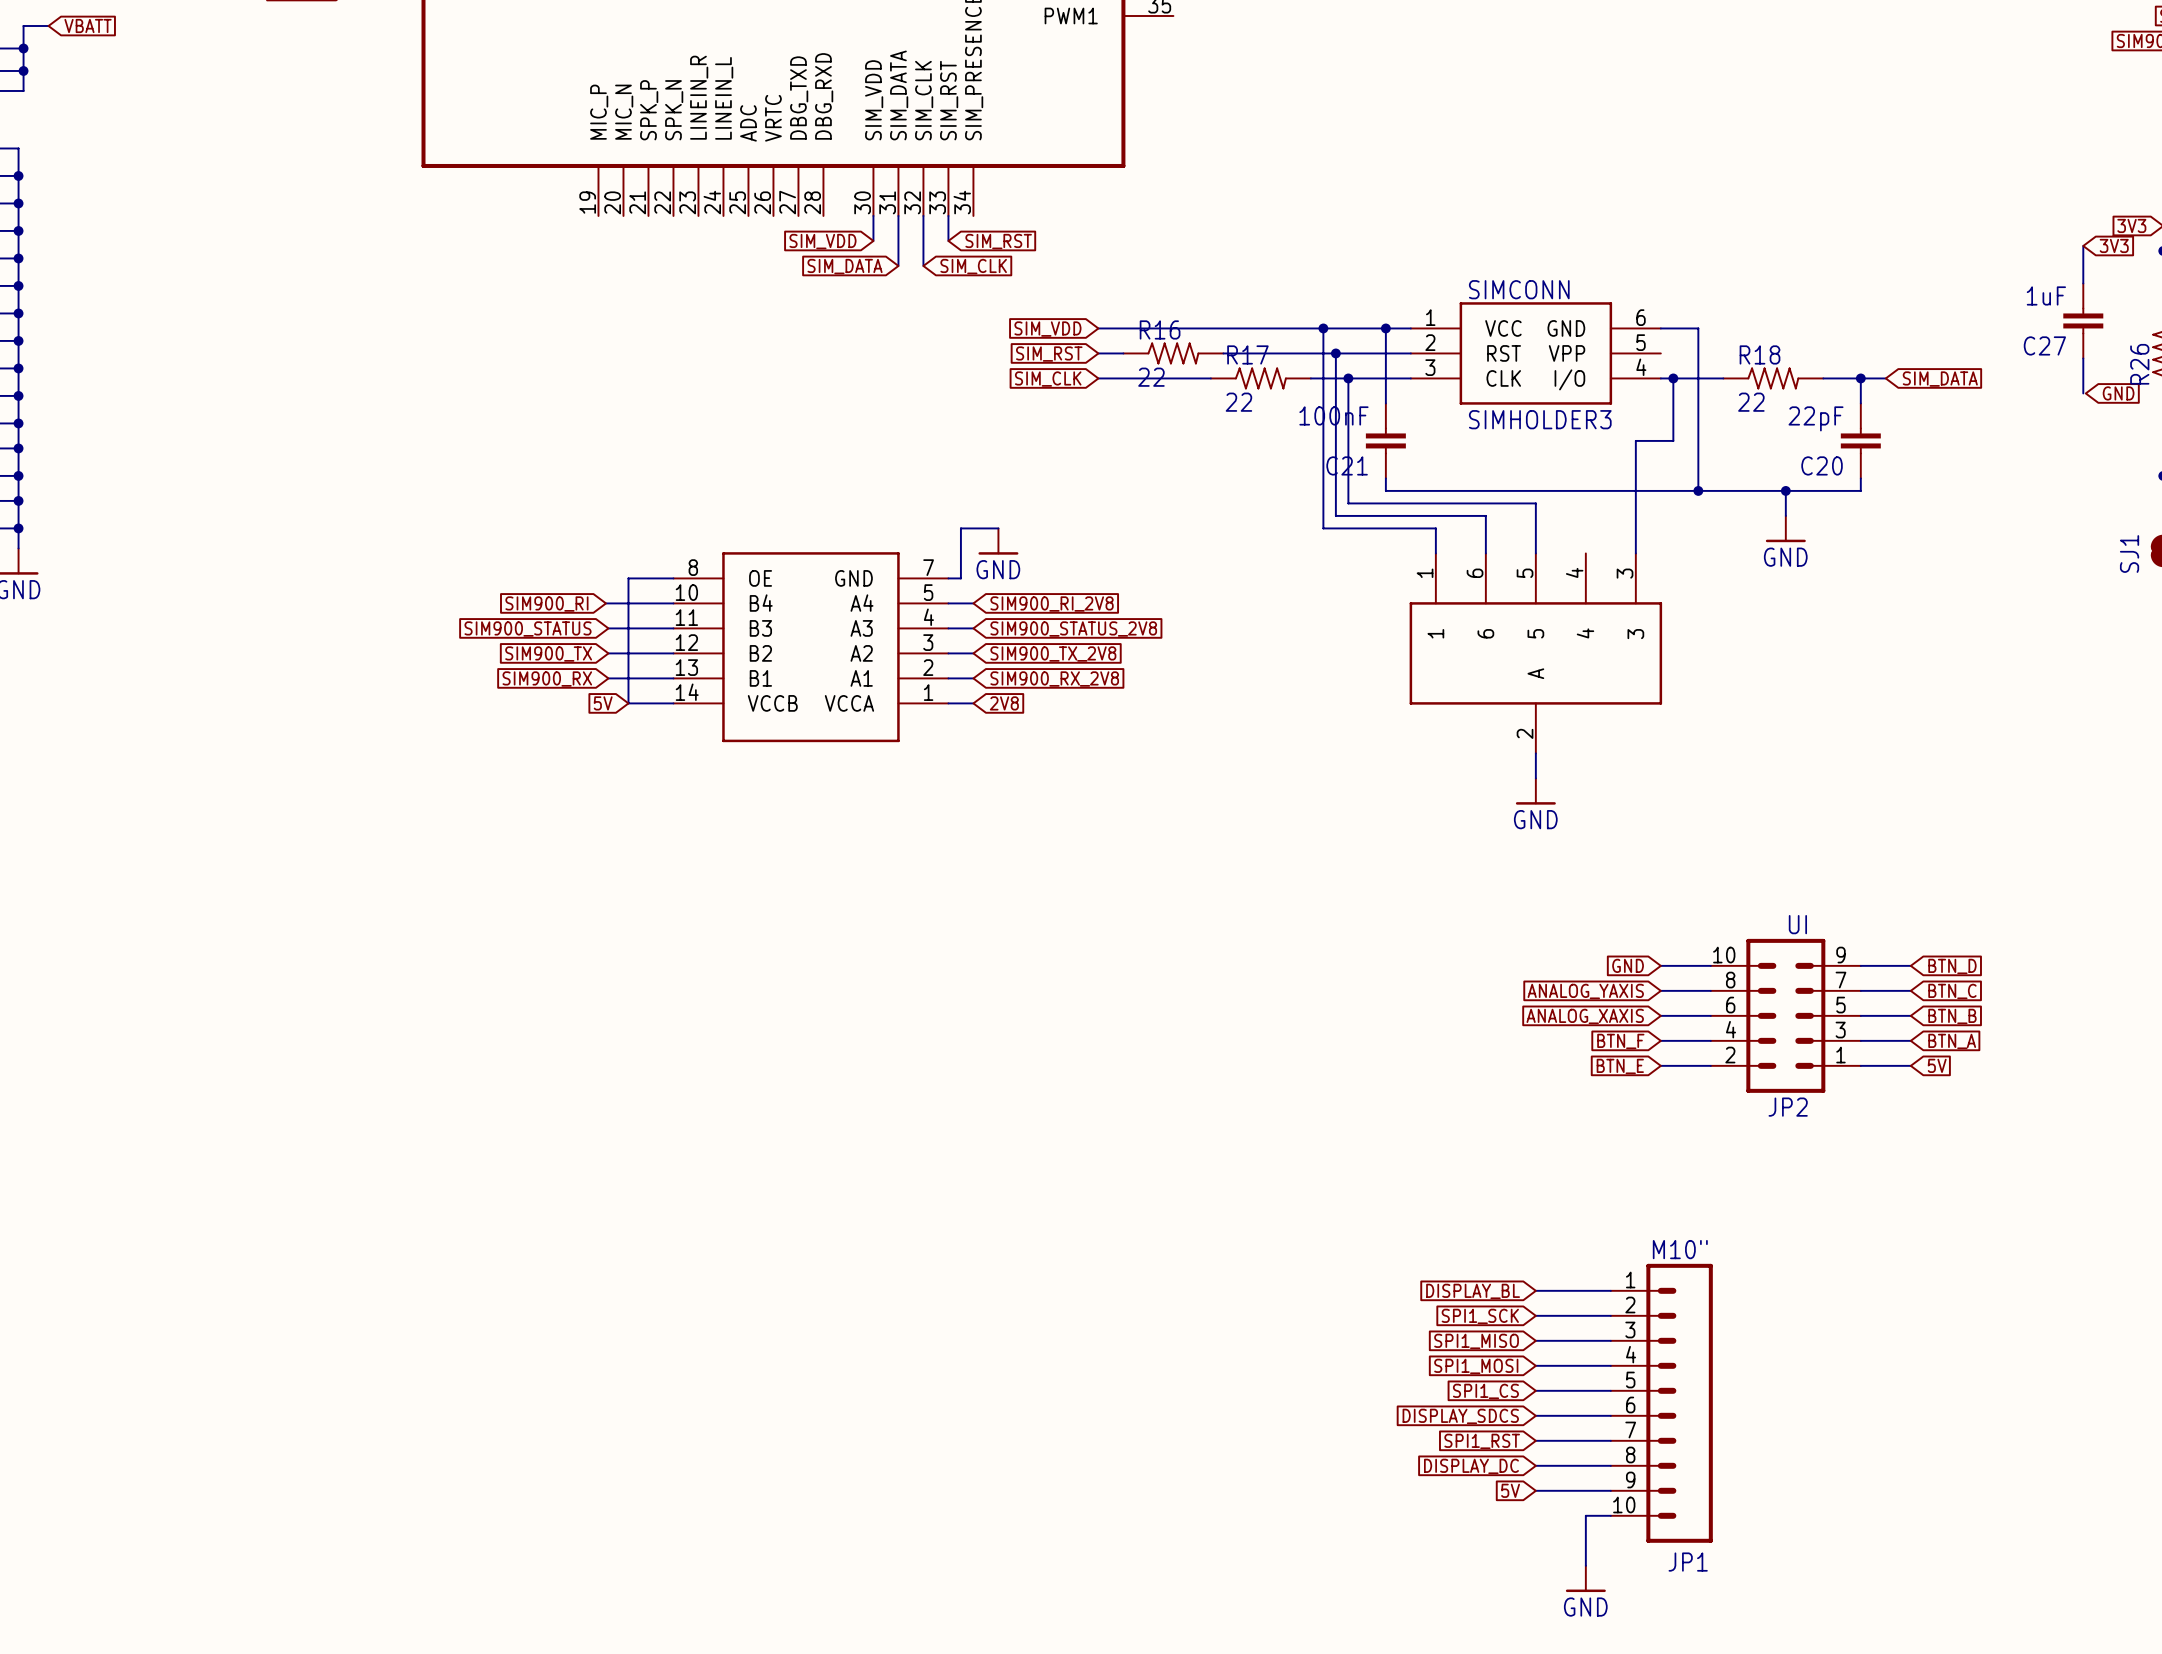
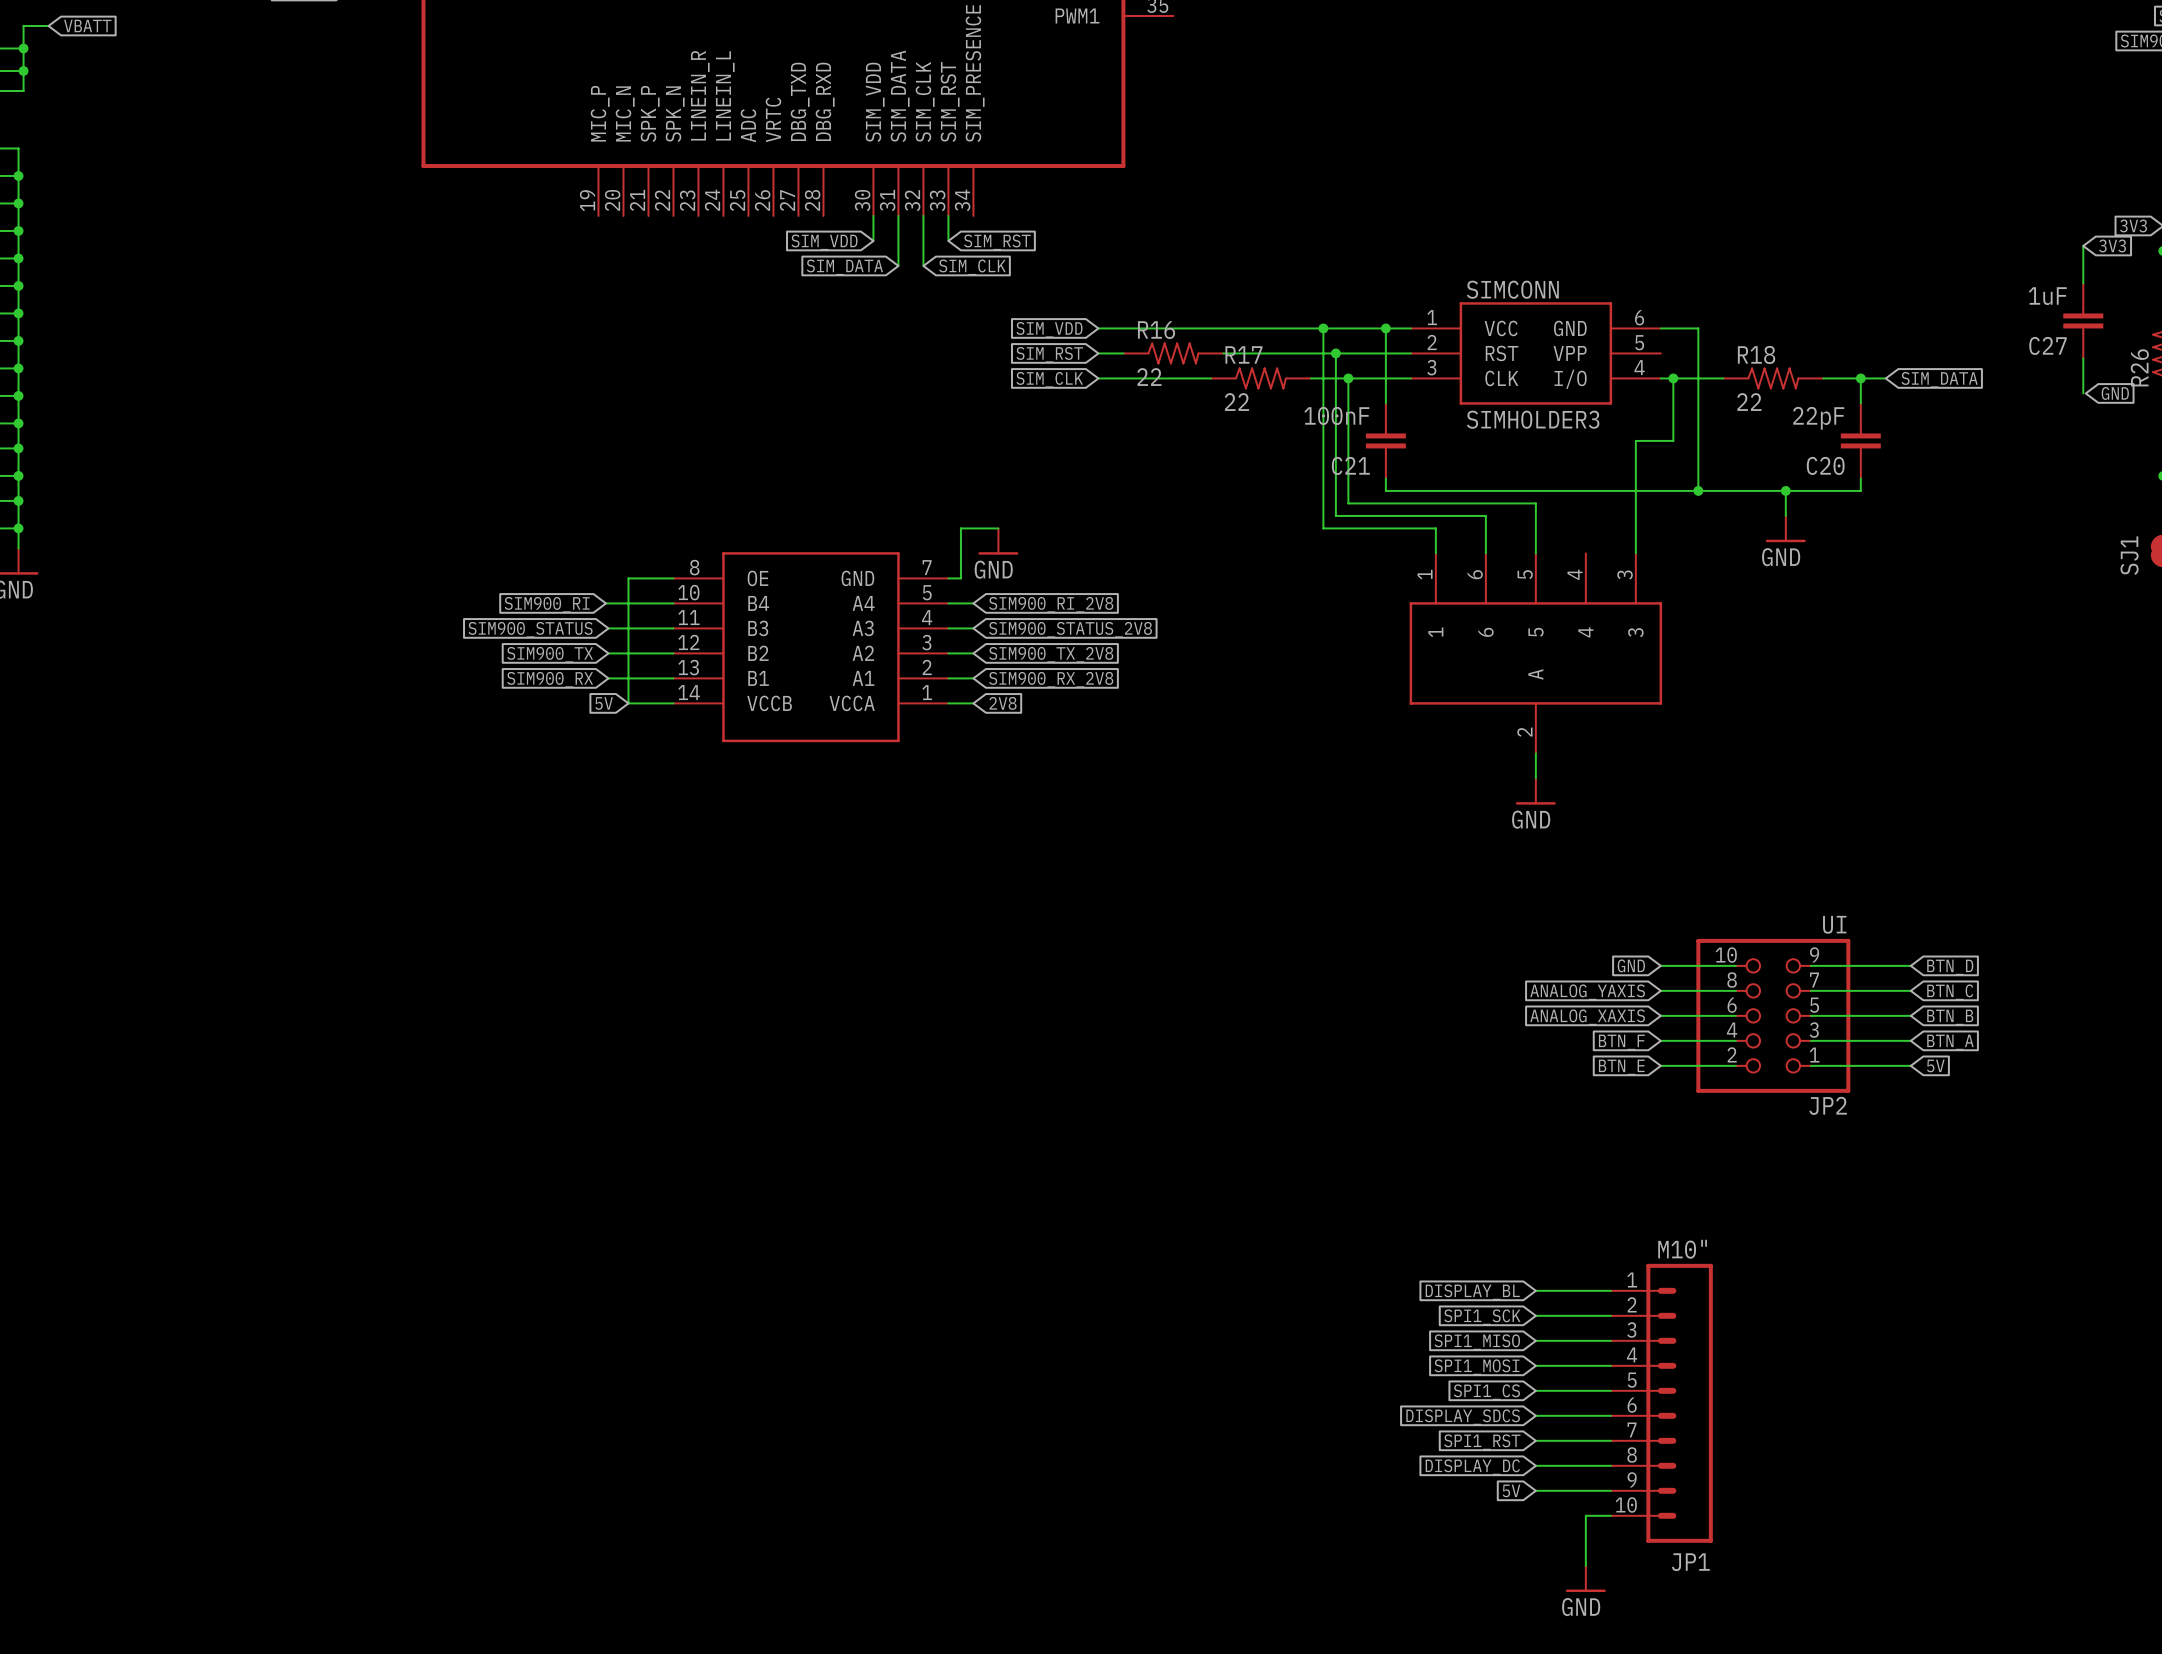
JP2 value position: UI (1797, 924) -> UI (1834, 924)
JP2 symbol: [1710, 938, 1861, 1093] -> [1696, 938, 1851, 1093]
JP2 name position: JP2 (1788, 1107) -> JP2 (1828, 1105)

